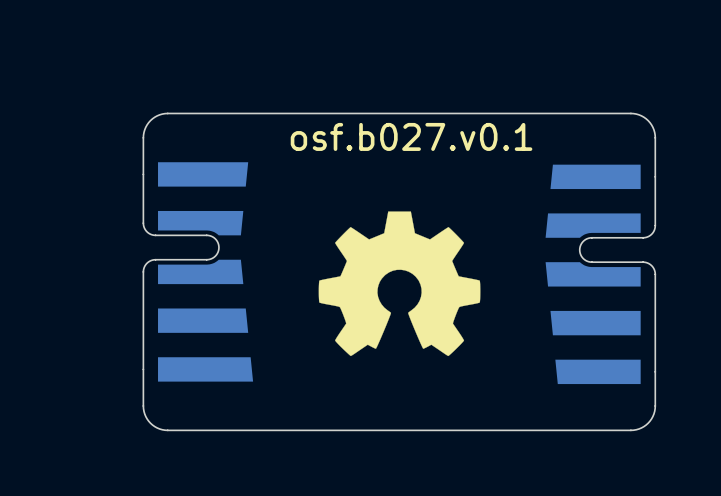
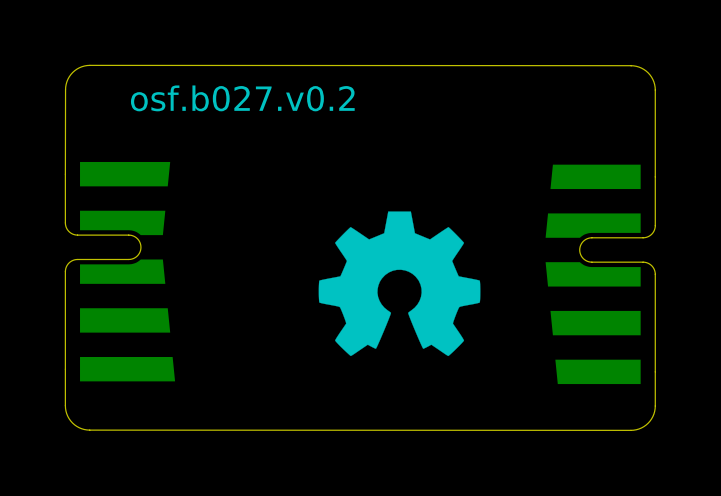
board edge: none -> (631, 65) (84, 65) (72, 72) (66, 84) (65, 174)
text: osf.b027.v0.1 (411, 136) -> osf.b027.v0.2 (242, 98)
board edge: (655, 137) (653, 129) (648, 120) (638, 114) (630, 113) (165, 113) (152, 118) (144, 129) (143, 174) -> (655, 137) (653, 82) (646, 71) (630, 65)
part position: (197, 271) -> (119, 271)
board edge: (143, 369) (144, 414) (152, 425) (165, 430) (630, 430) -> (65, 369) (66, 413) (74, 424) (87, 429) (630, 430)

